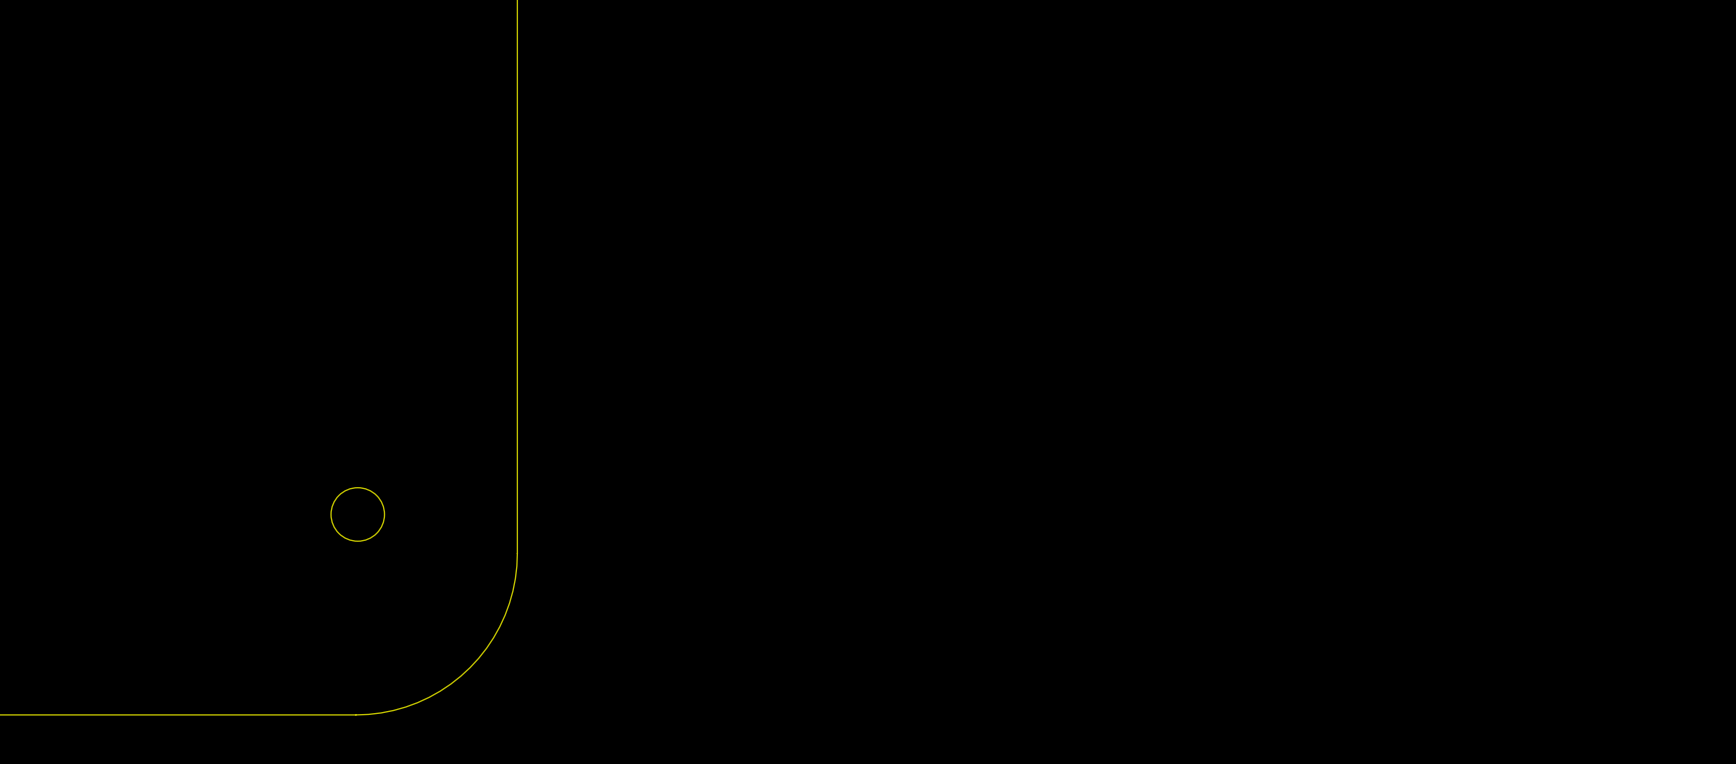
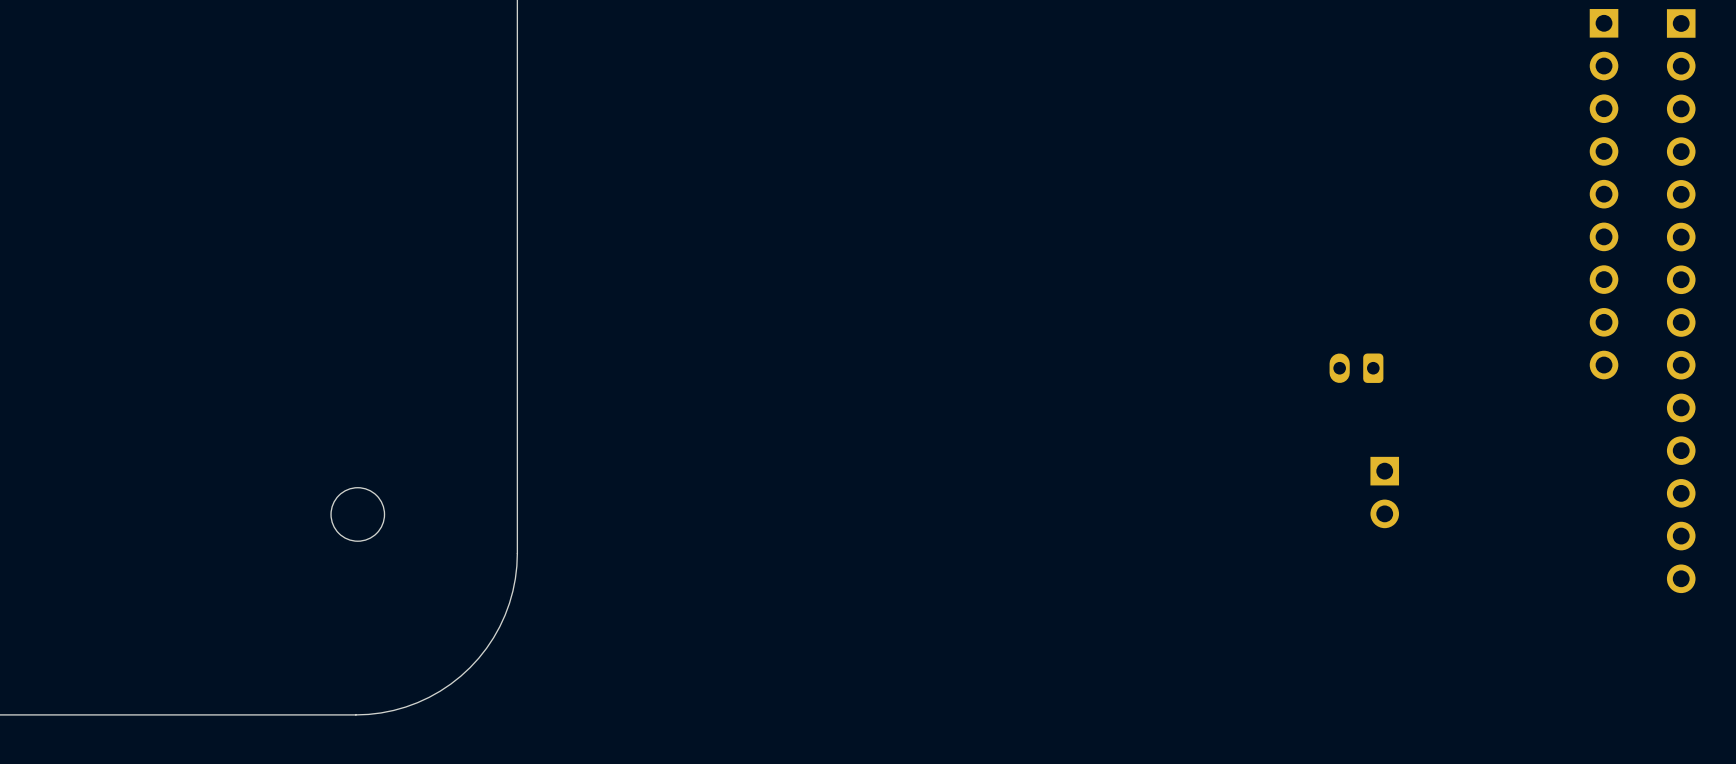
part: none -> (1604, 194)
part: none -> (1681, 301)
part: none -> (1356, 368)
part: none -> (1384, 492)

